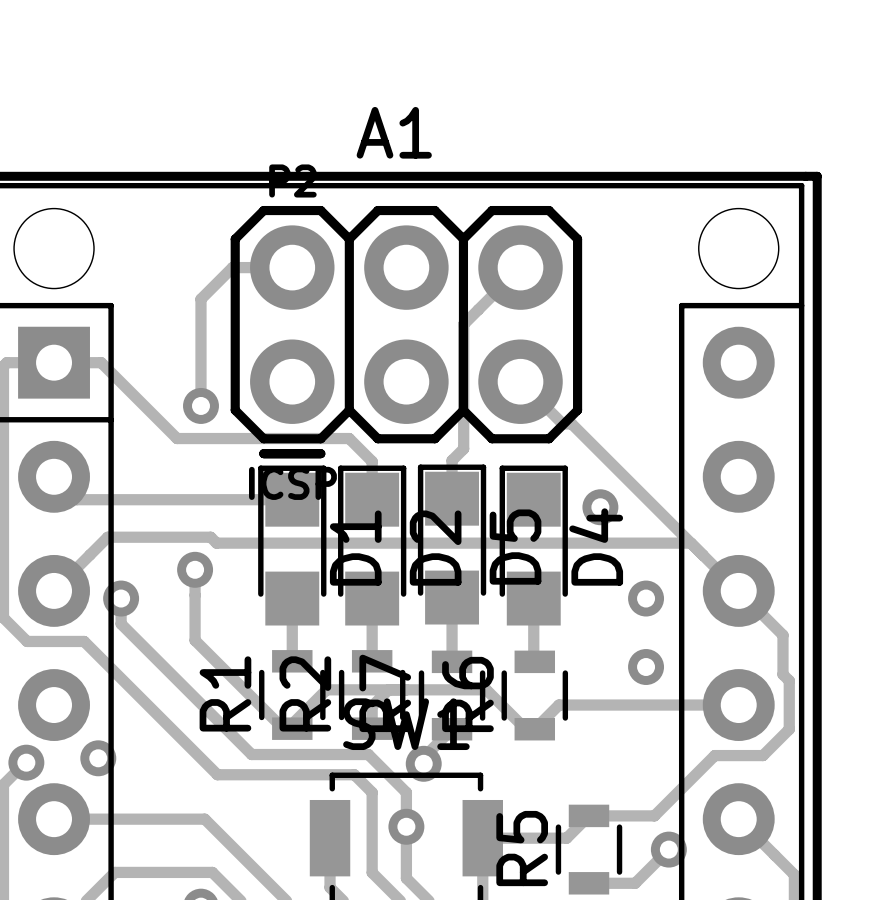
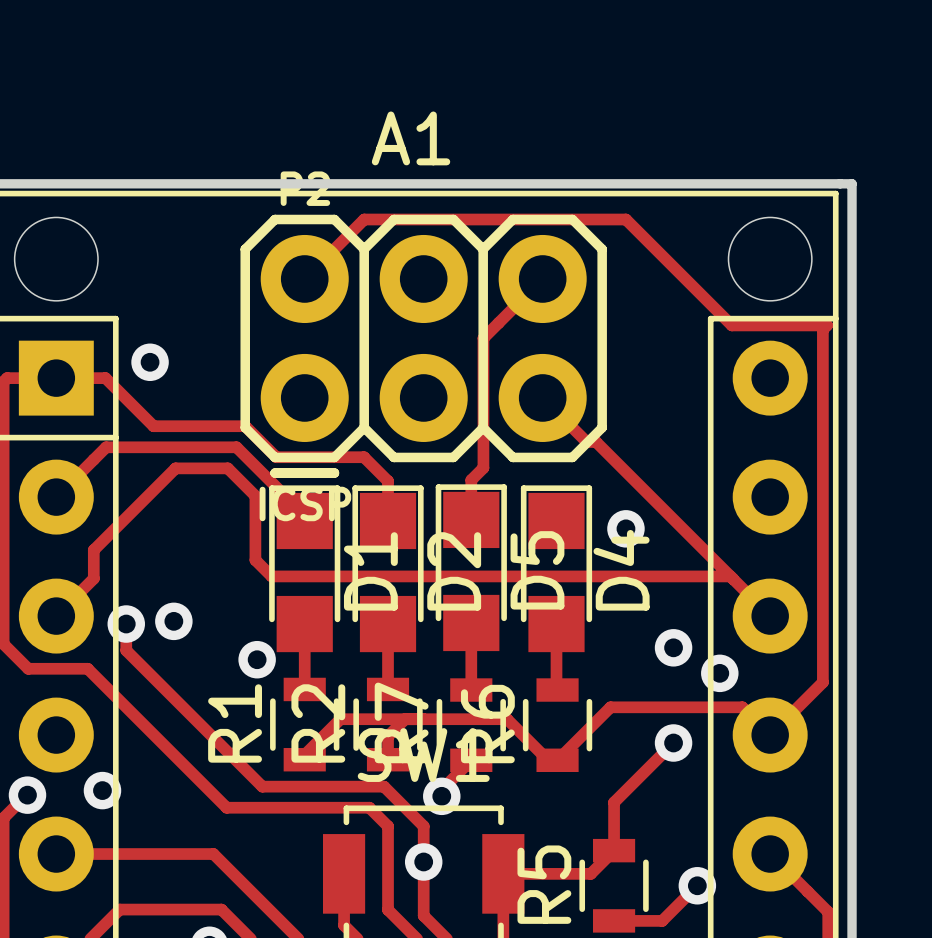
track: (292, 267) (232, 267) (200, 299) (200, 405) -> (304, 278) (364, 219) (625, 219) (731, 325) (827, 325) (822, 329) (822, 682) (770, 735) (742, 707) (610, 707) (582, 735)
via position: (200, 405) -> (150, 362)
track: (147, 408) (177, 438) (265, 438) -> (153, 426) (245, 426) (276, 457)
track: (54, 476) (76, 499) (292, 499) -> (56, 497) (106, 447) (236, 447) (304, 515) (304, 520)
track: (690, 543) (216, 543) (210, 537) (107, 537) (89, 554) -> (730, 576) (271, 576) (255, 560) (255, 495) (227, 468) (175, 468) (93, 550) (93, 578)
track: (195, 569) (195, 640) (283, 728) (292, 728) -> none
via position: (195, 569) -> (173, 621)
track: (738, 590) (782, 635) (782, 674) (789, 680) (789, 729) (762, 755) (714, 755) (654, 815) (588, 815) -> (673, 742) (614, 802) (614, 850)
via position: (646, 598) -> (673, 647)
via: none -> (257, 659)
via: none -> (719, 673)
via: (646, 667) -> none
track: (558, 705) (738, 705) -> none
via: none -> (673, 742)

